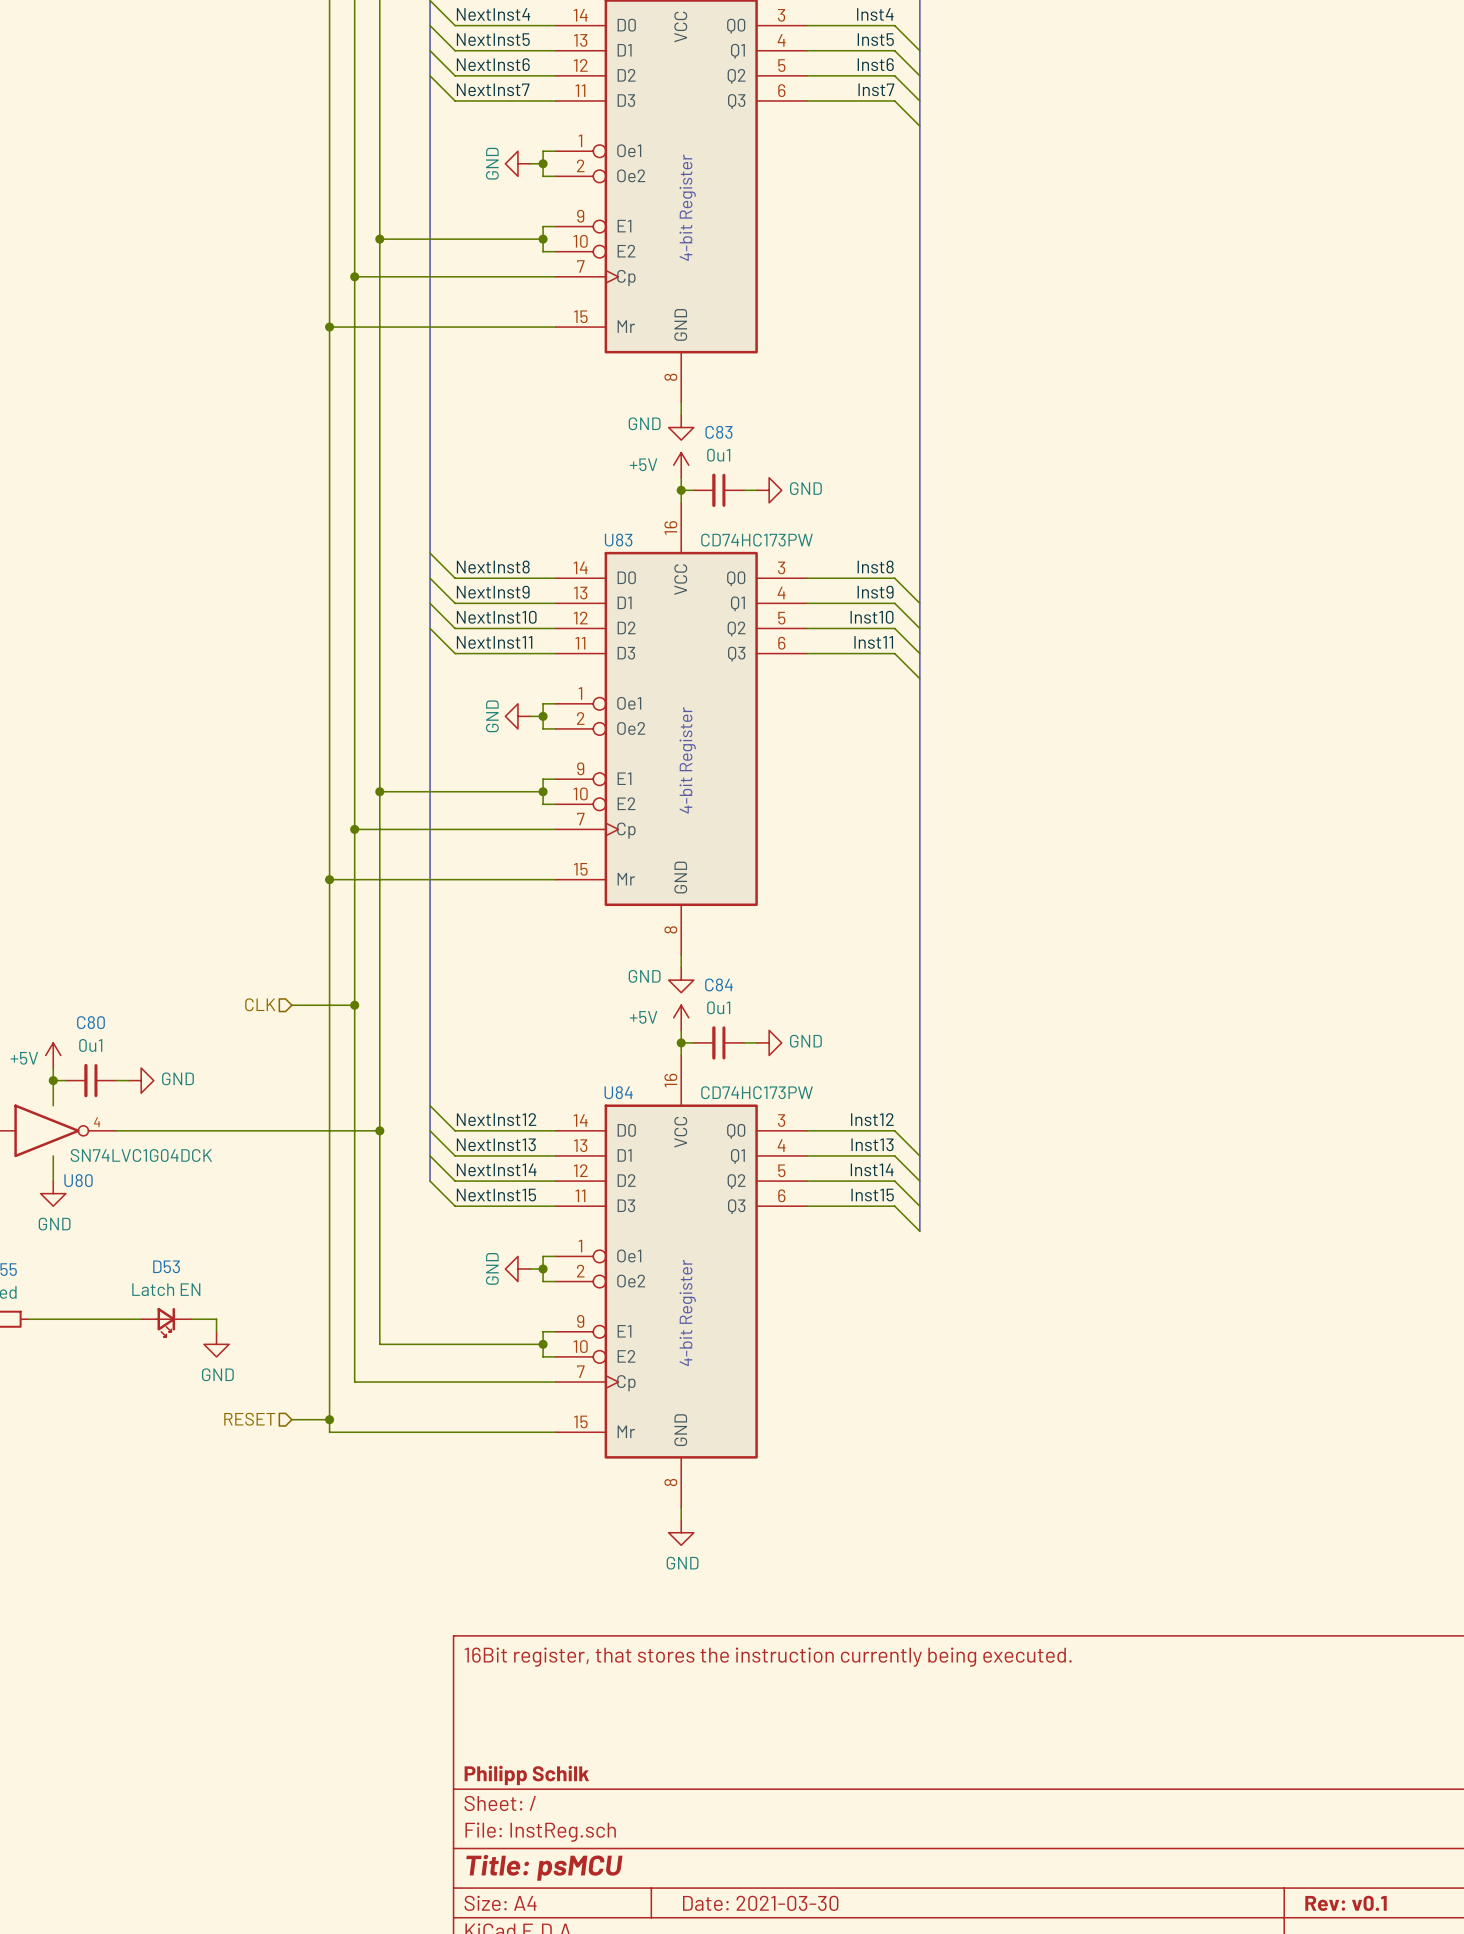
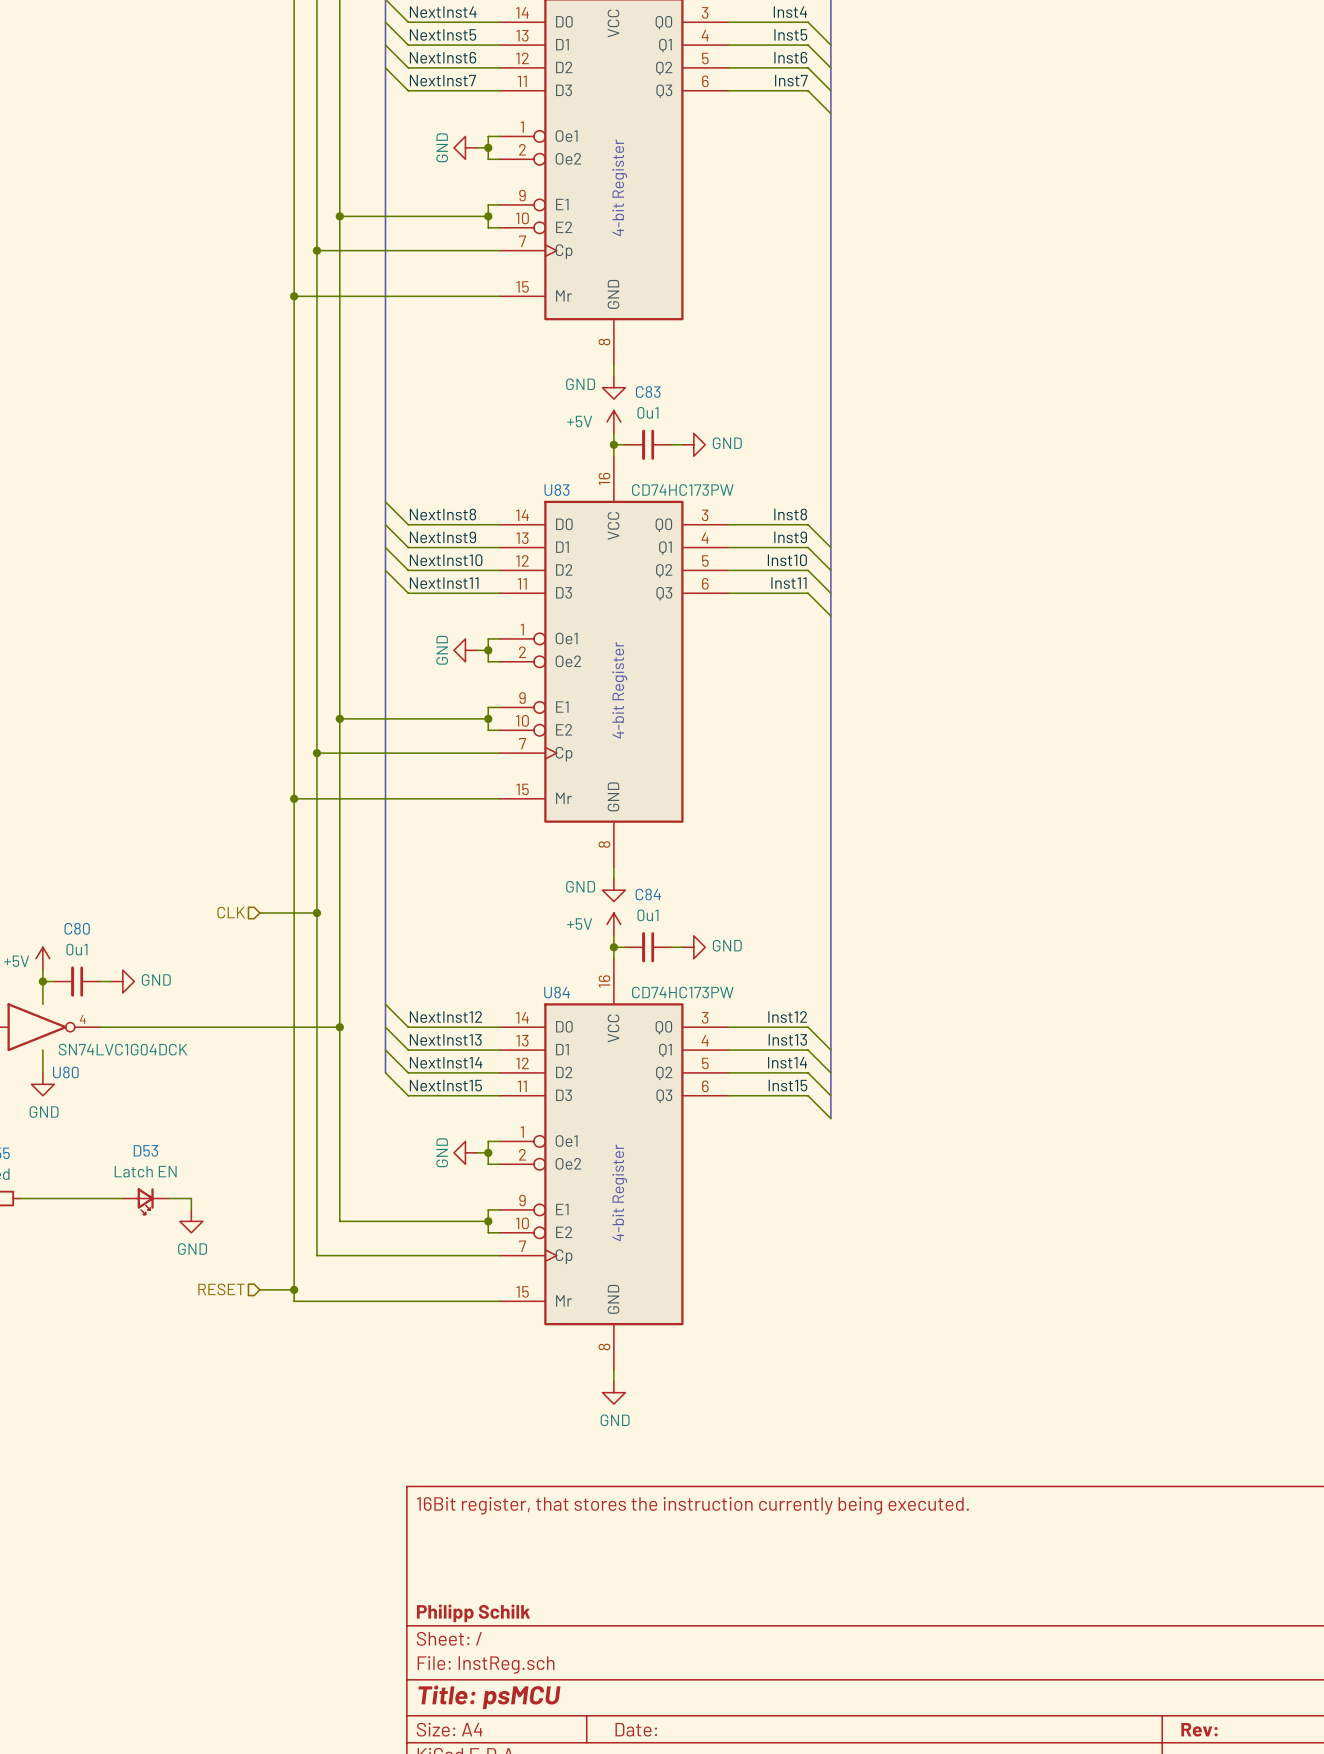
title block: Date: 2021-03-30 (760, 1903) -> Date: (636, 1729)
title block: Rev: v0.1 (1346, 1903) -> Rev: (1199, 1729)

